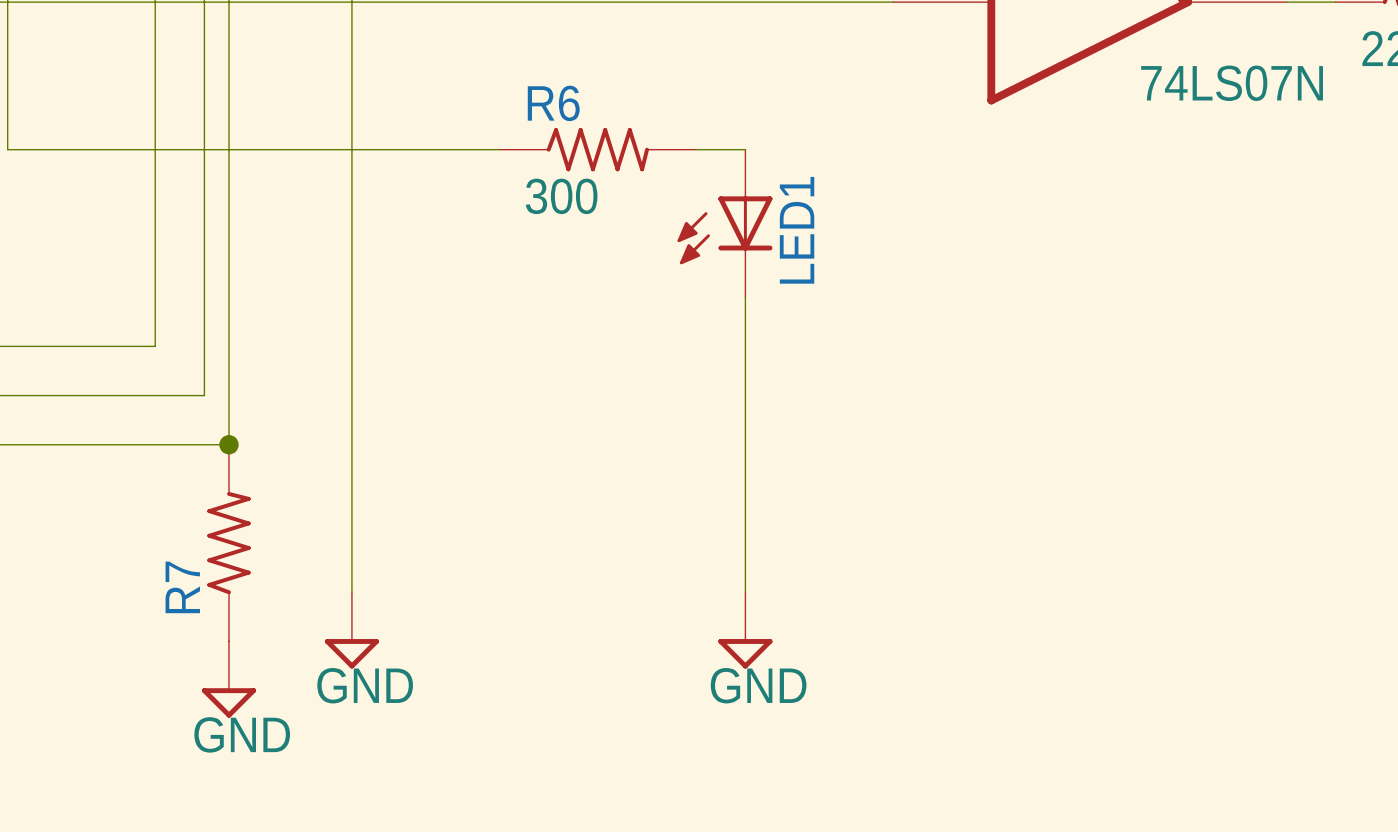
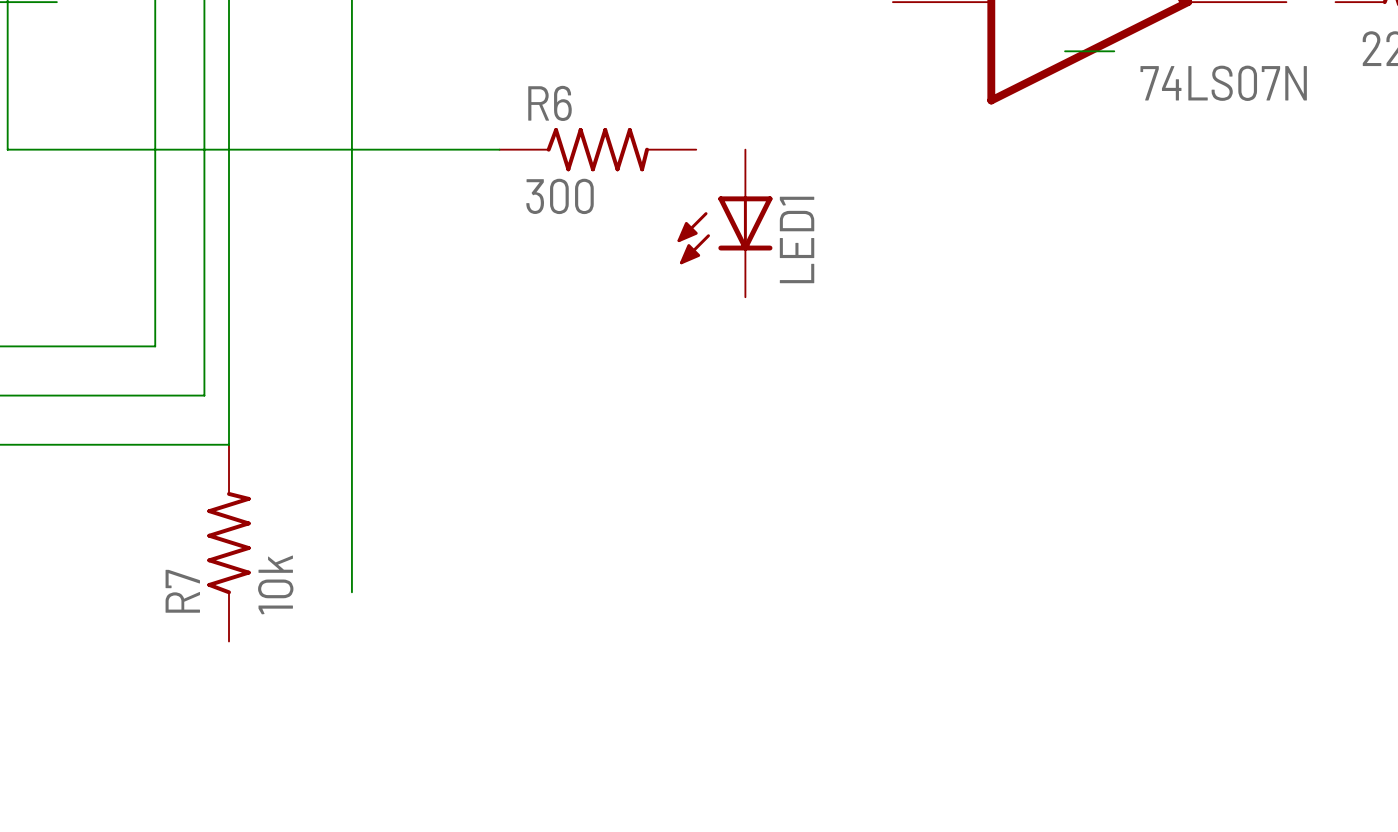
wire: (56, 2) (892, 2) -> none
wire: (1286, 2) (1335, 2) -> (1065, 51) (1114, 51)
wire: (696, 149) (745, 149) -> none
wire: (745, 297) (745, 592) -> none
junction: (229, 444) -> none
R7 value: none -> 10k (275, 584)
power symbol: GND (351, 630) -> none
power symbol: GND (745, 630) -> none
power symbol: GND (229, 679) -> none

